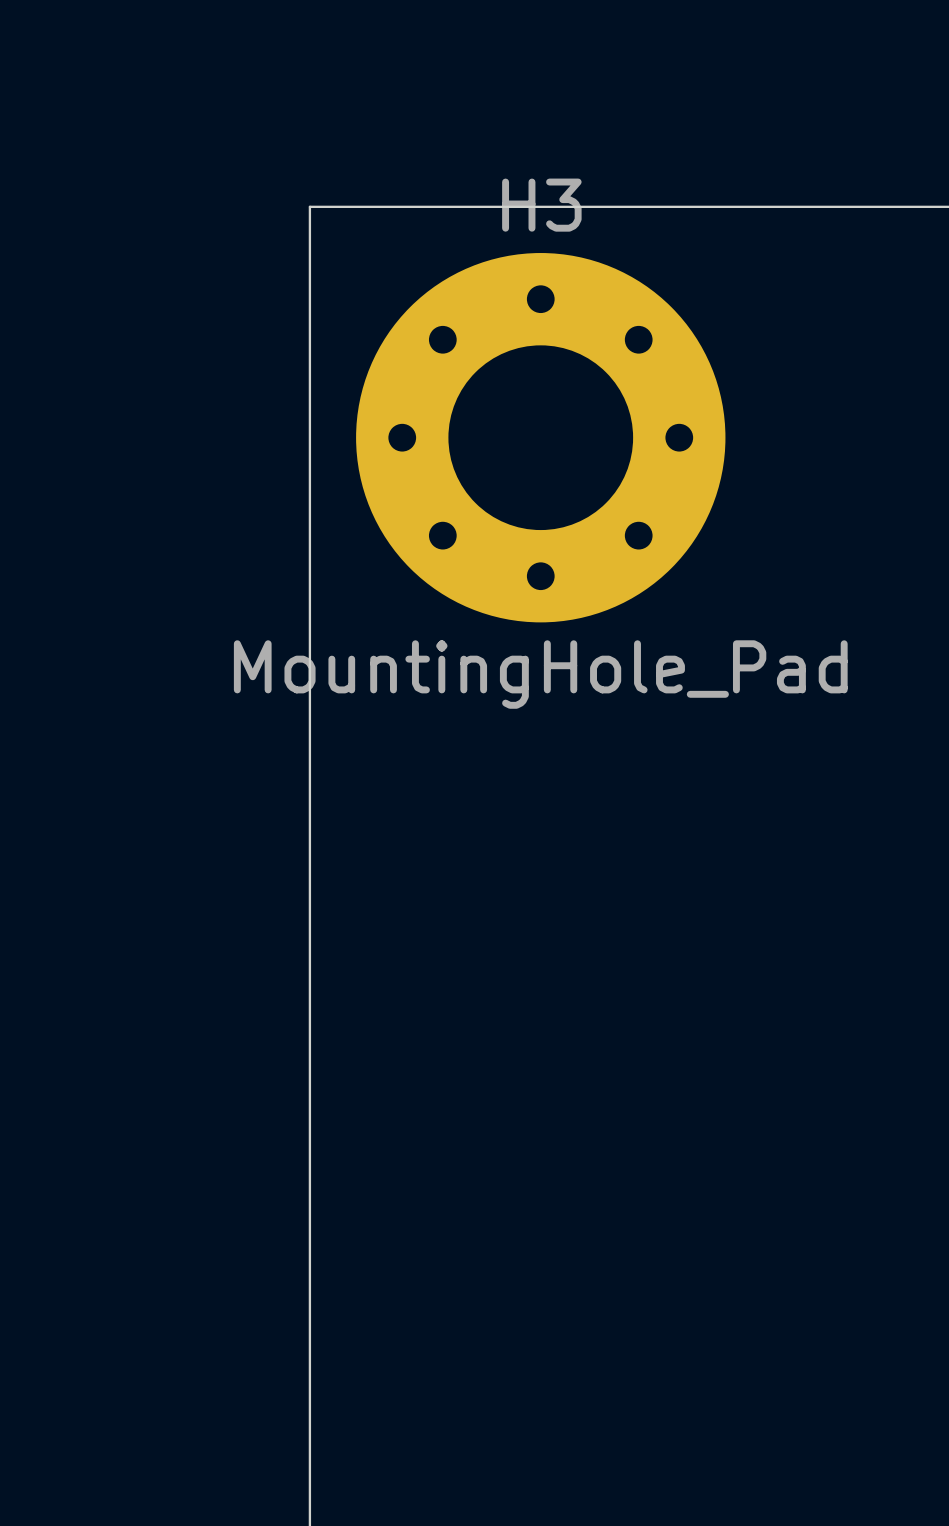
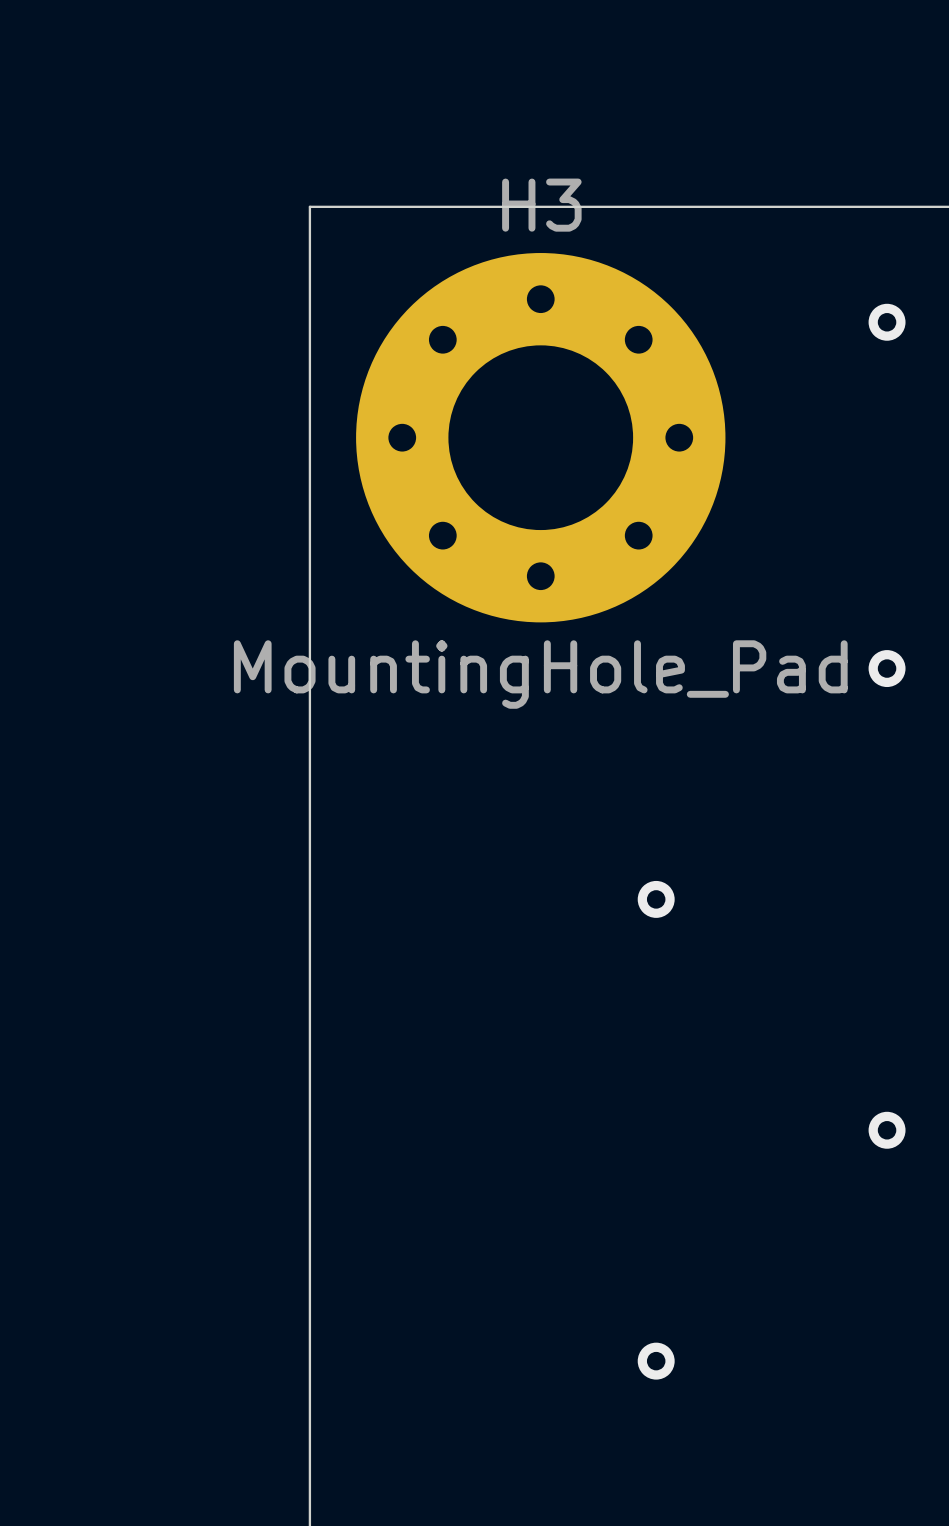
via: none -> (887, 322)
via: none -> (887, 668)
via: none -> (656, 899)
via: none -> (887, 1130)
via: none -> (656, 1361)

